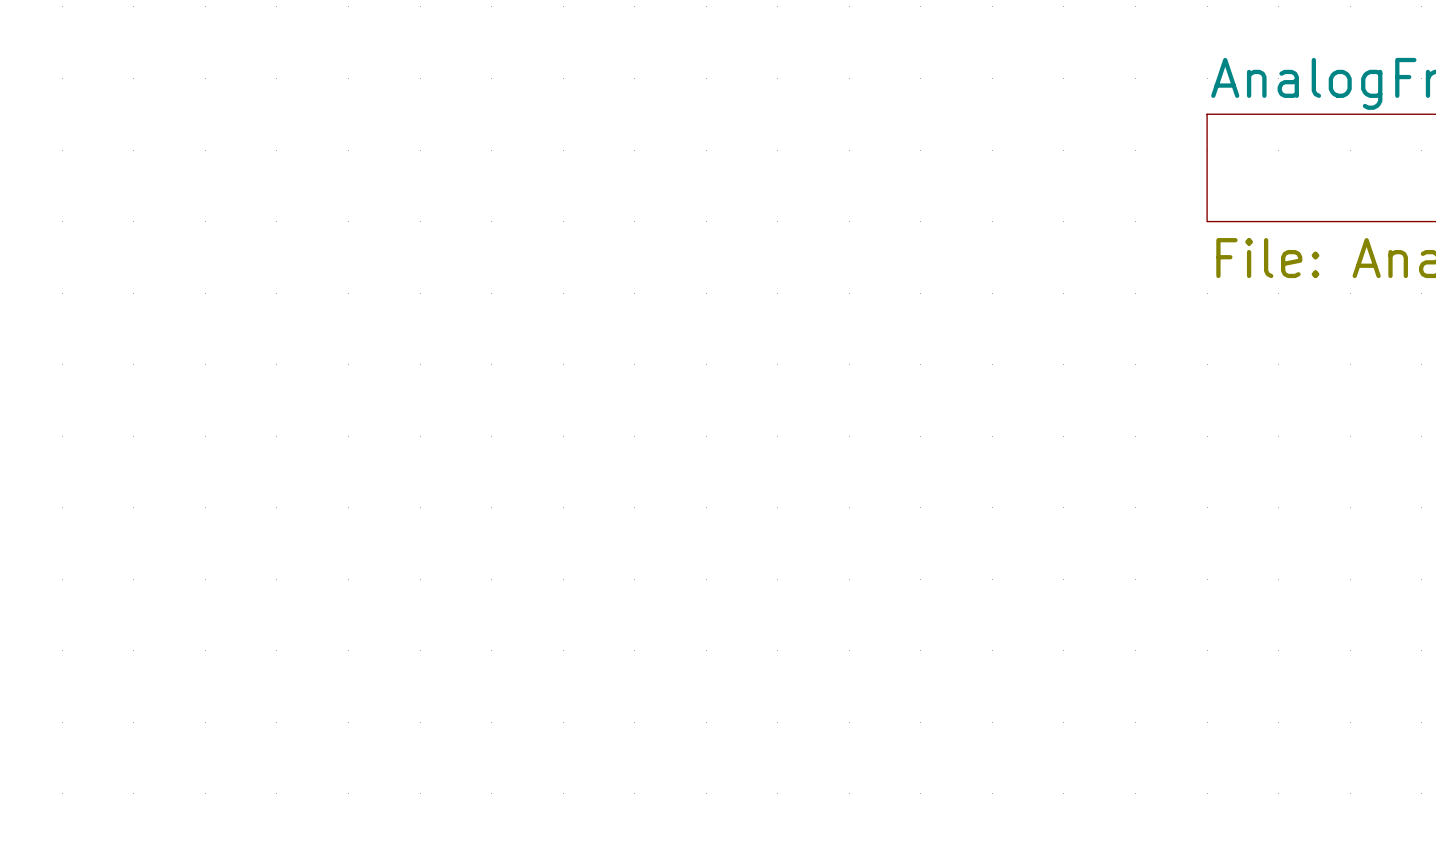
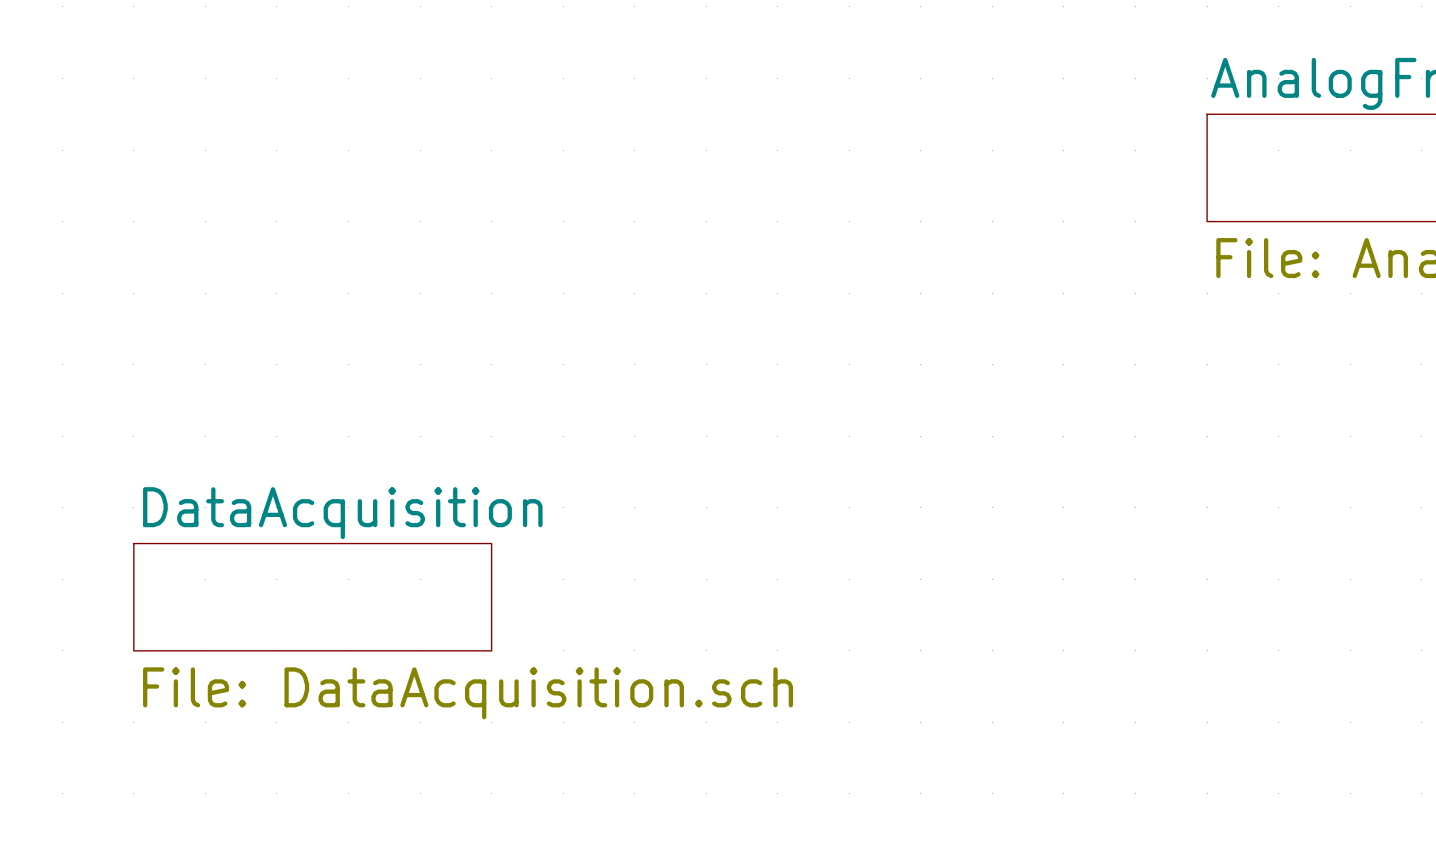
sheet DataAcquisition: none -> File: DataAcquisition.sch (312, 597)

